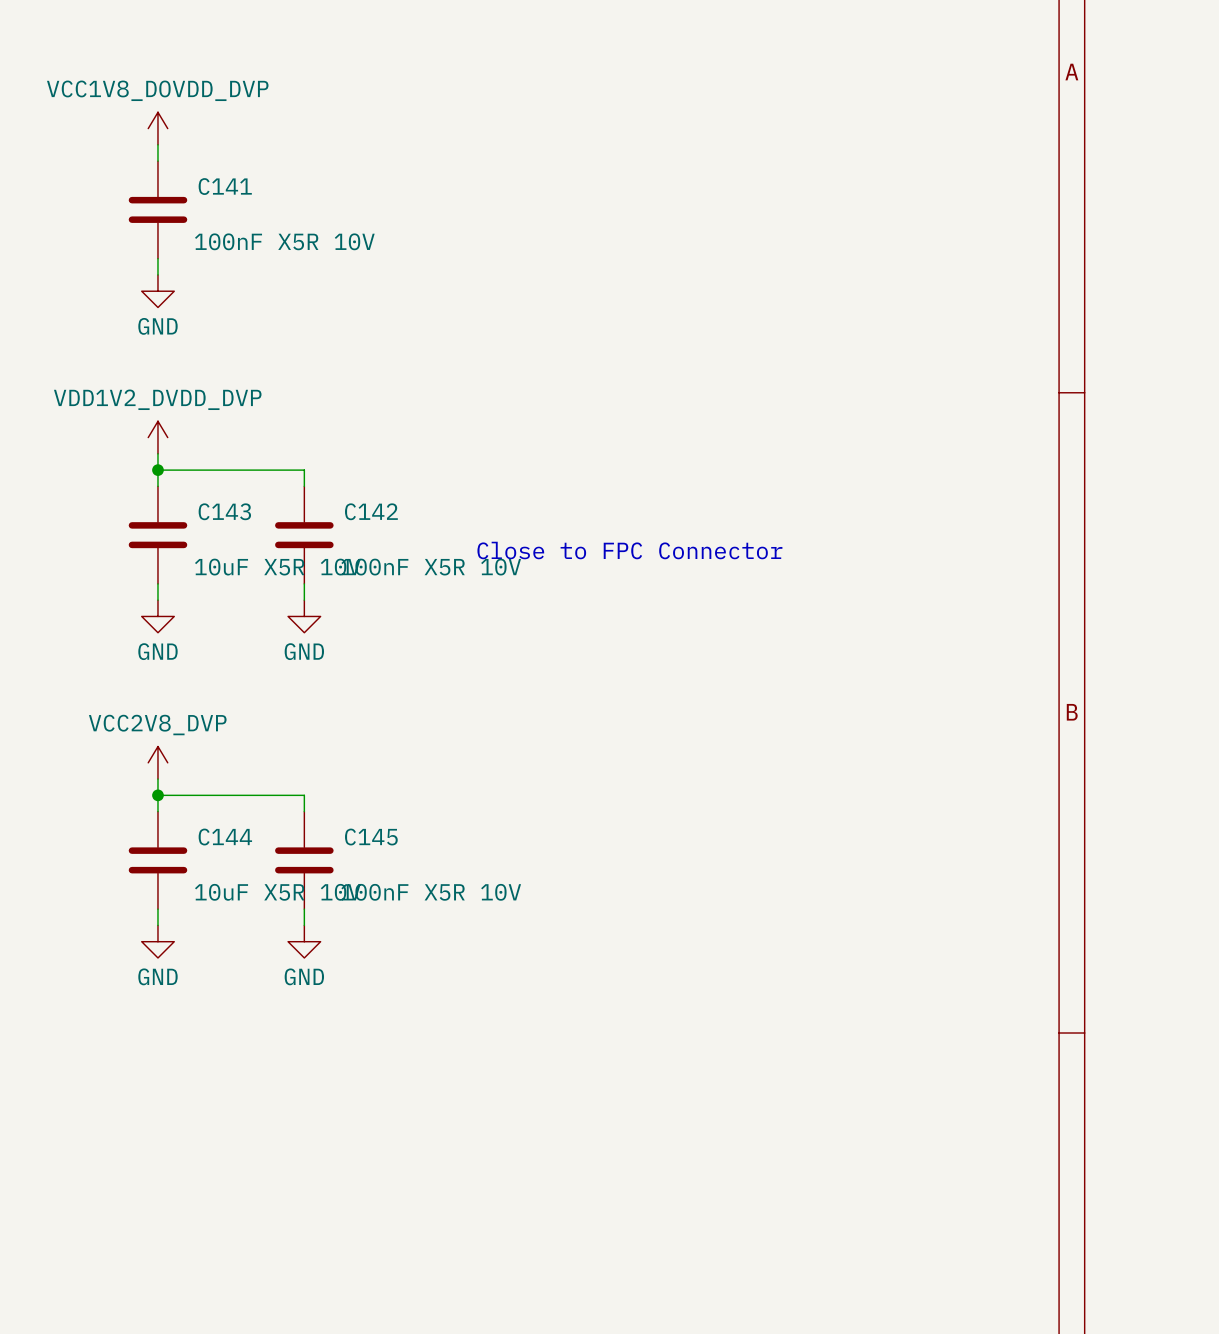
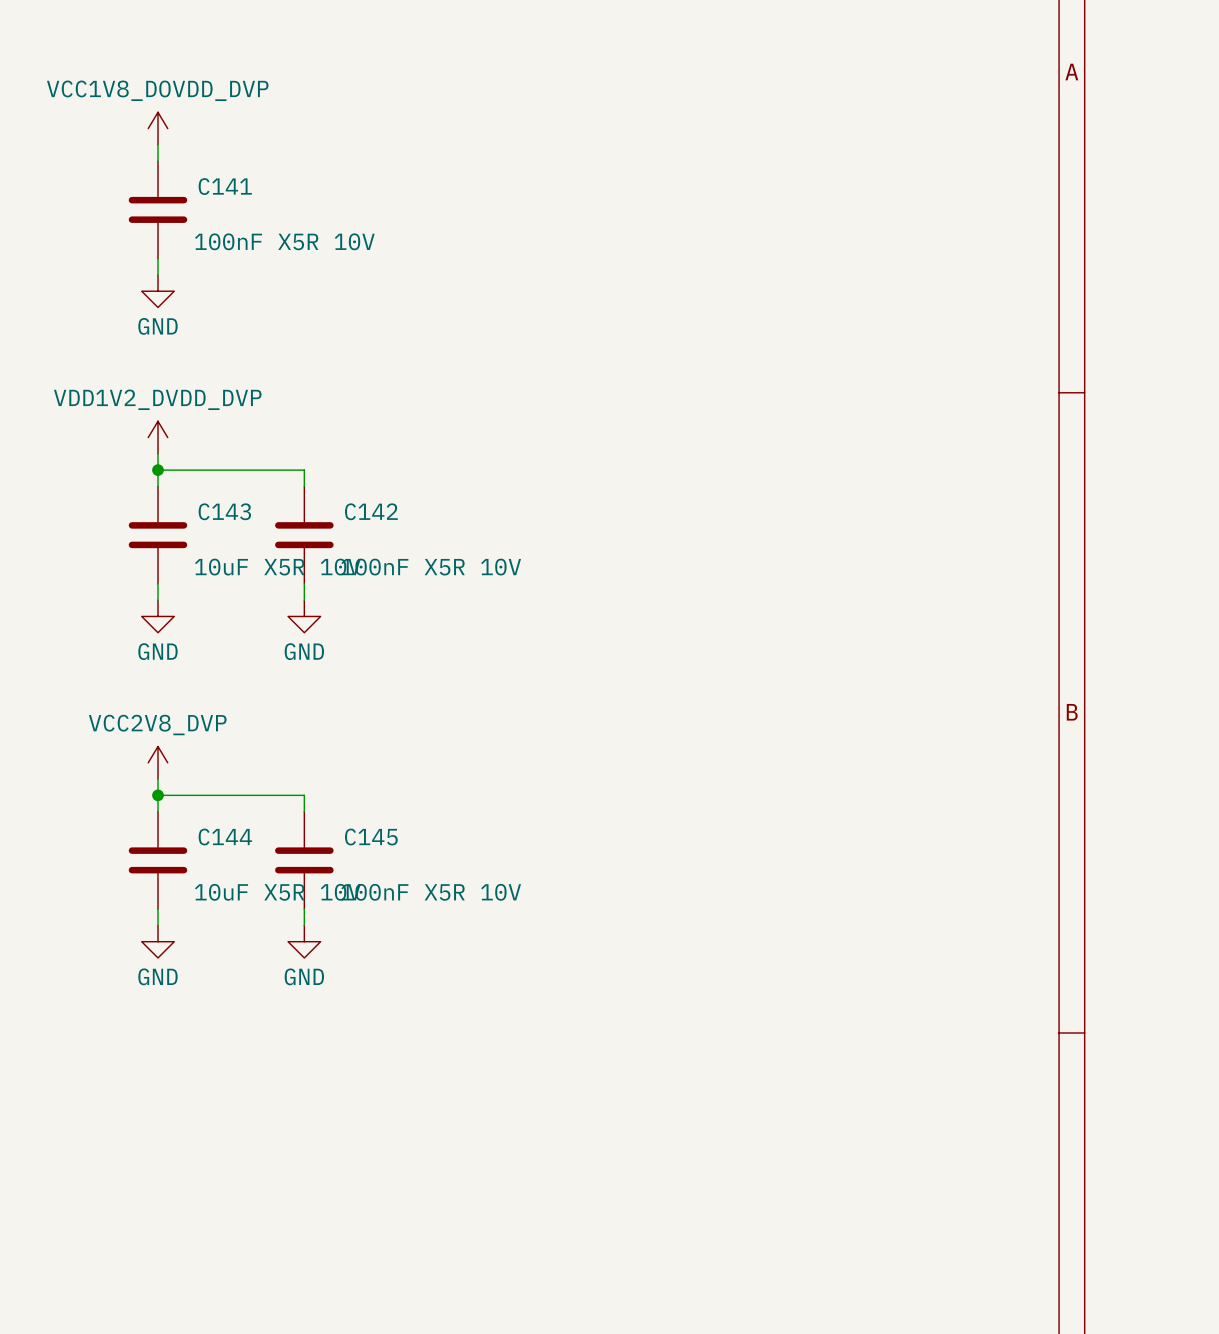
text: Close to FPC Connector (629, 550) -> none

